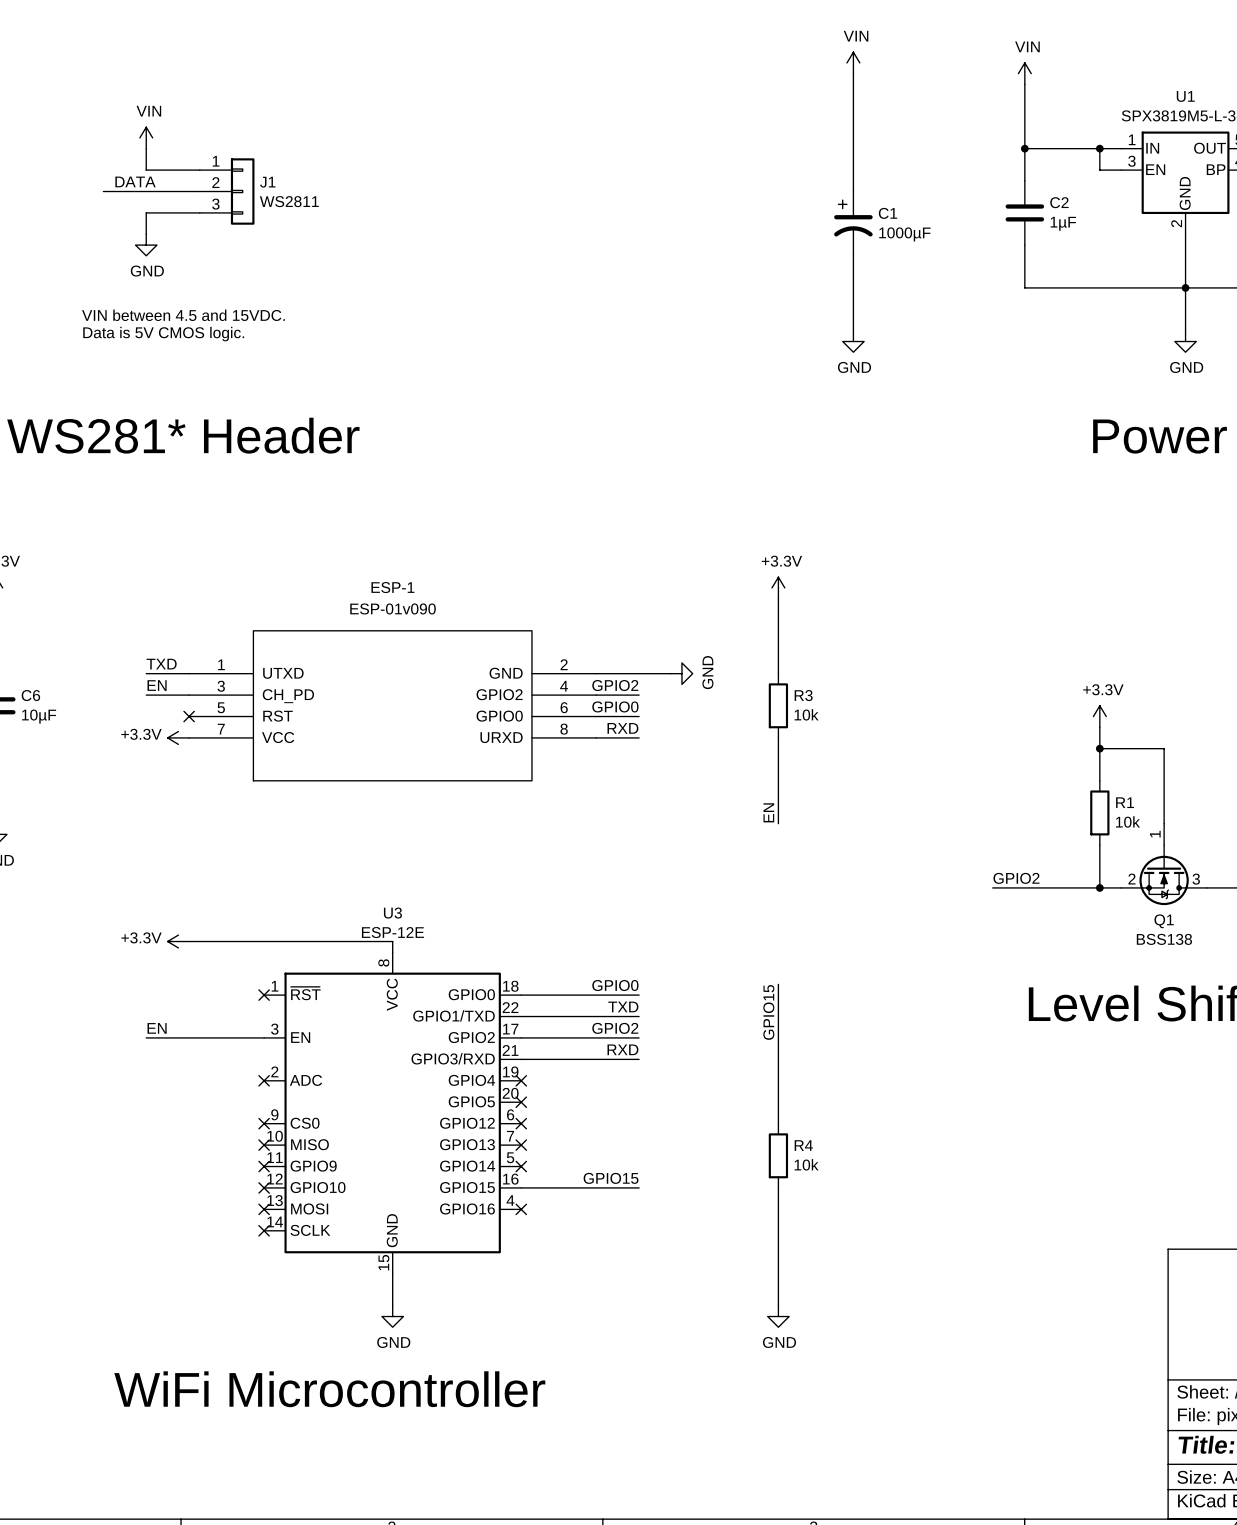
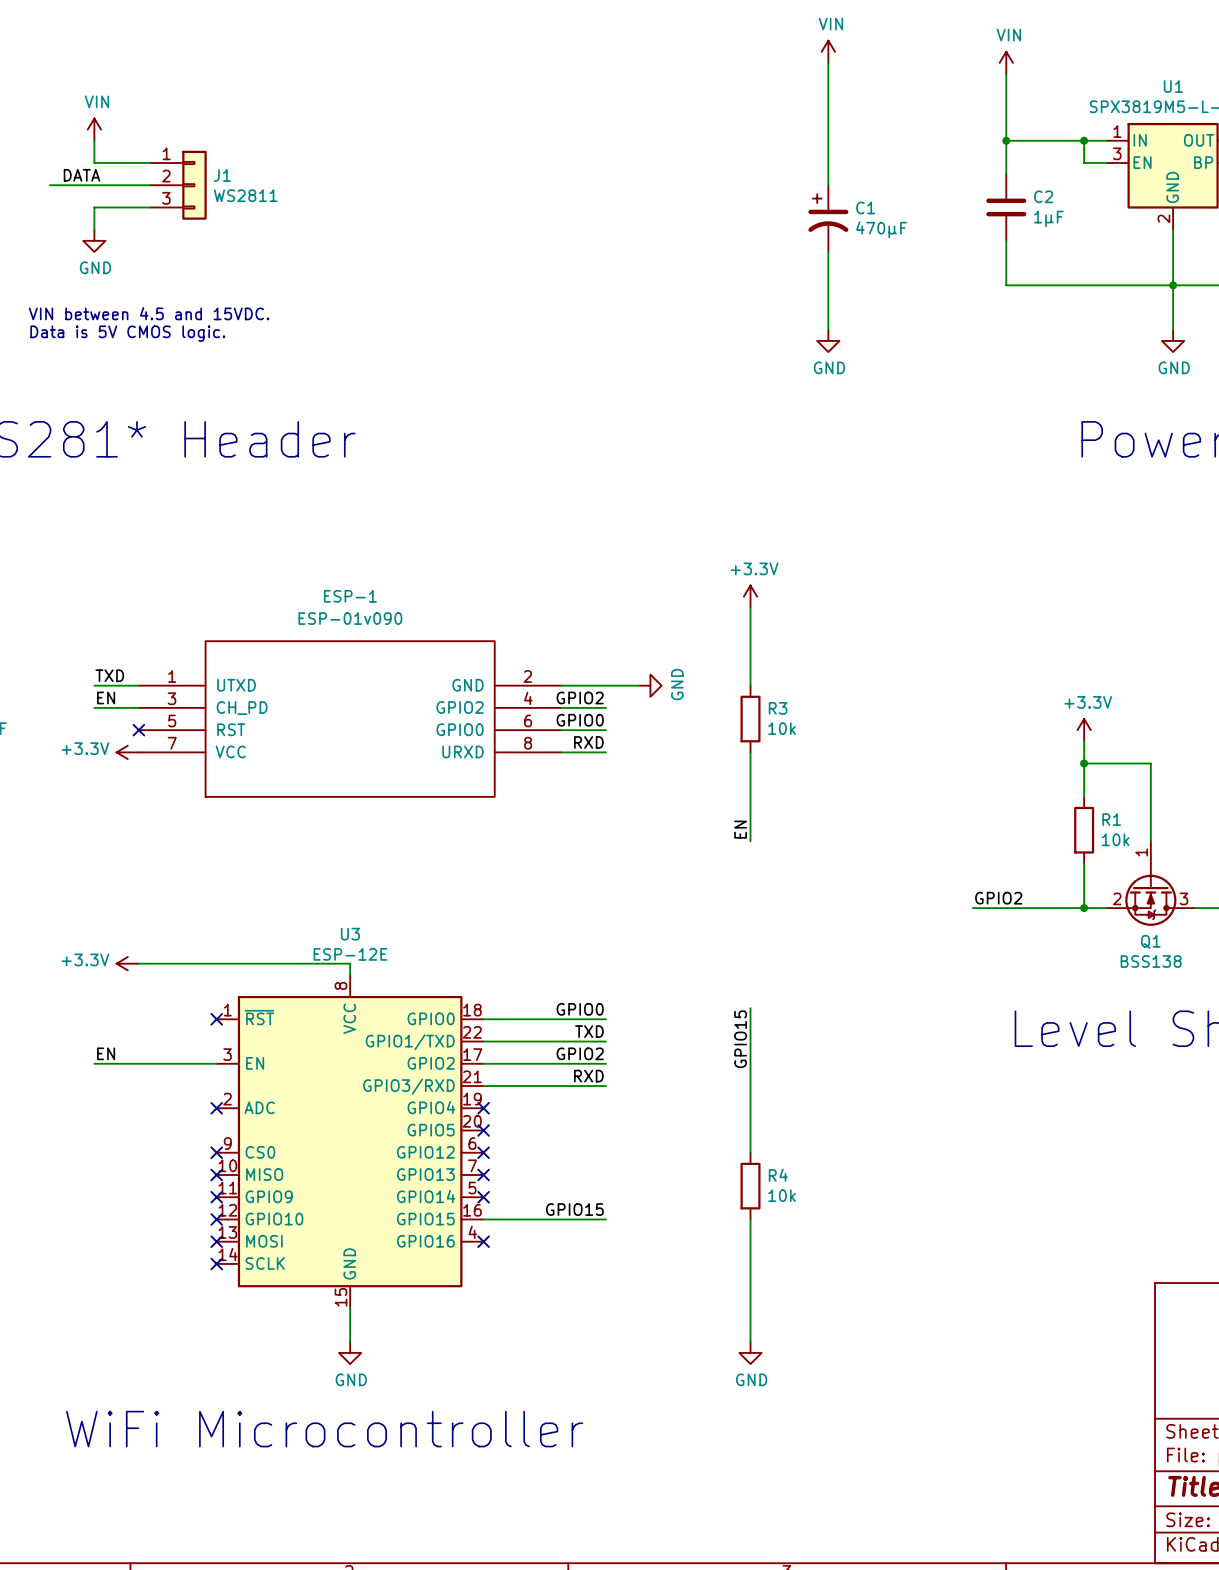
C1 value: 1000µF (904, 234) -> 470µF (881, 229)

